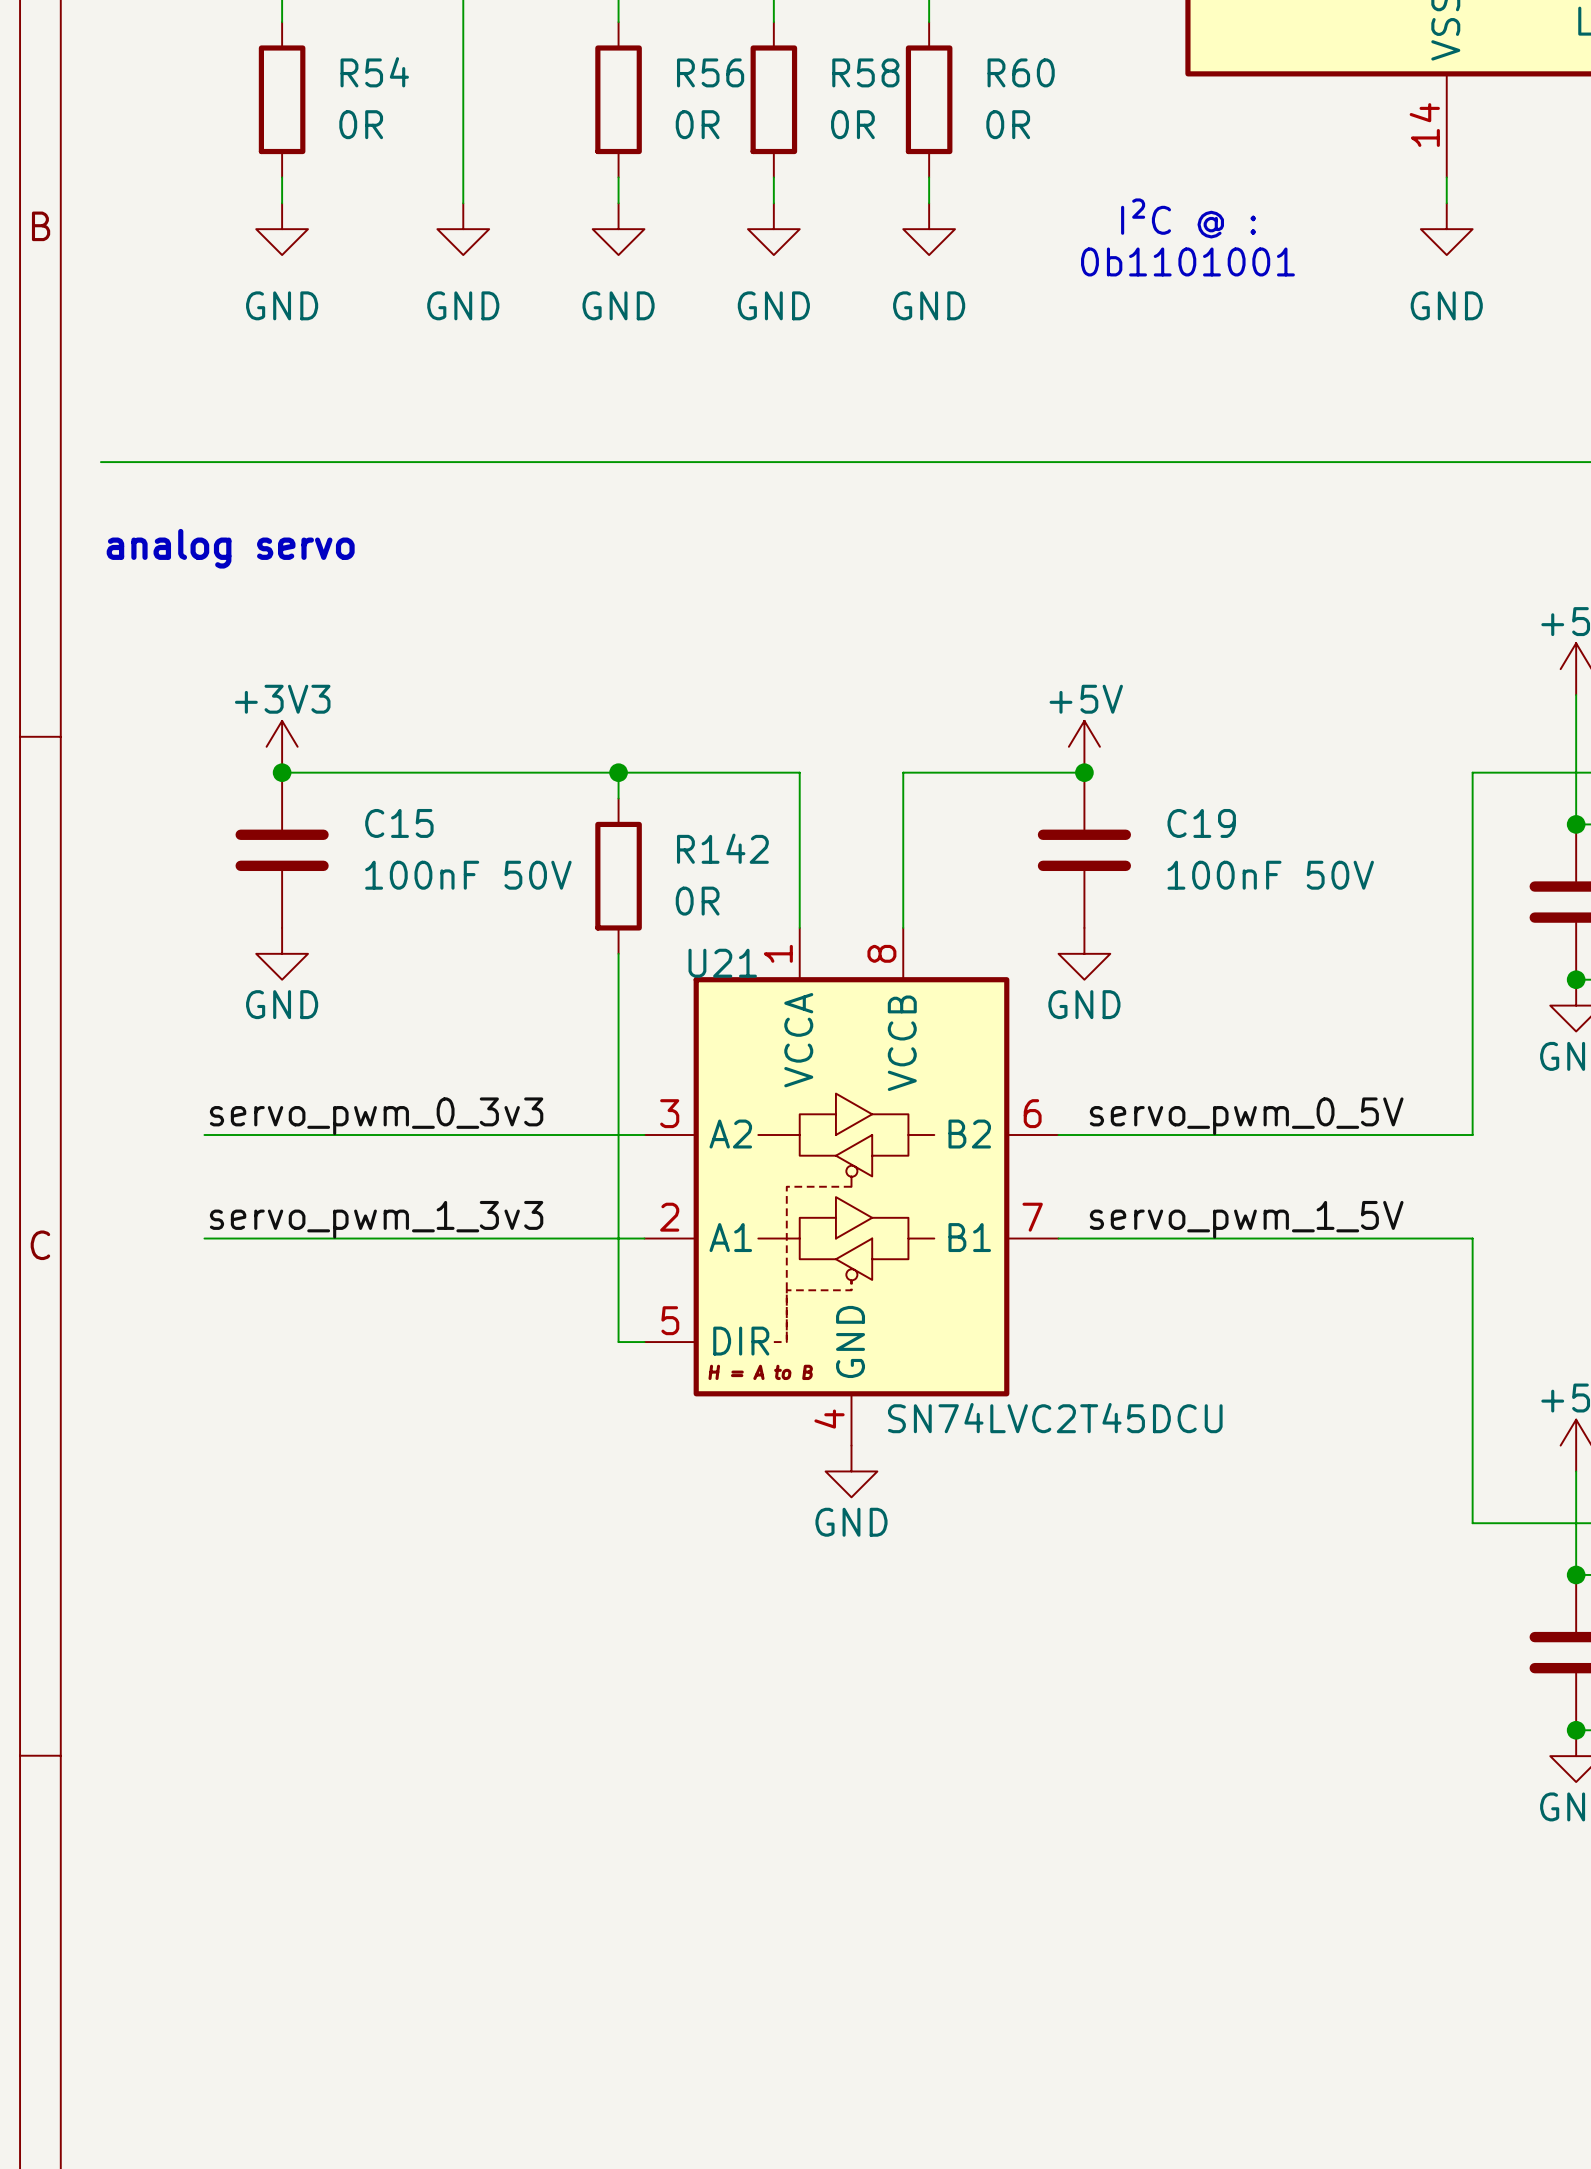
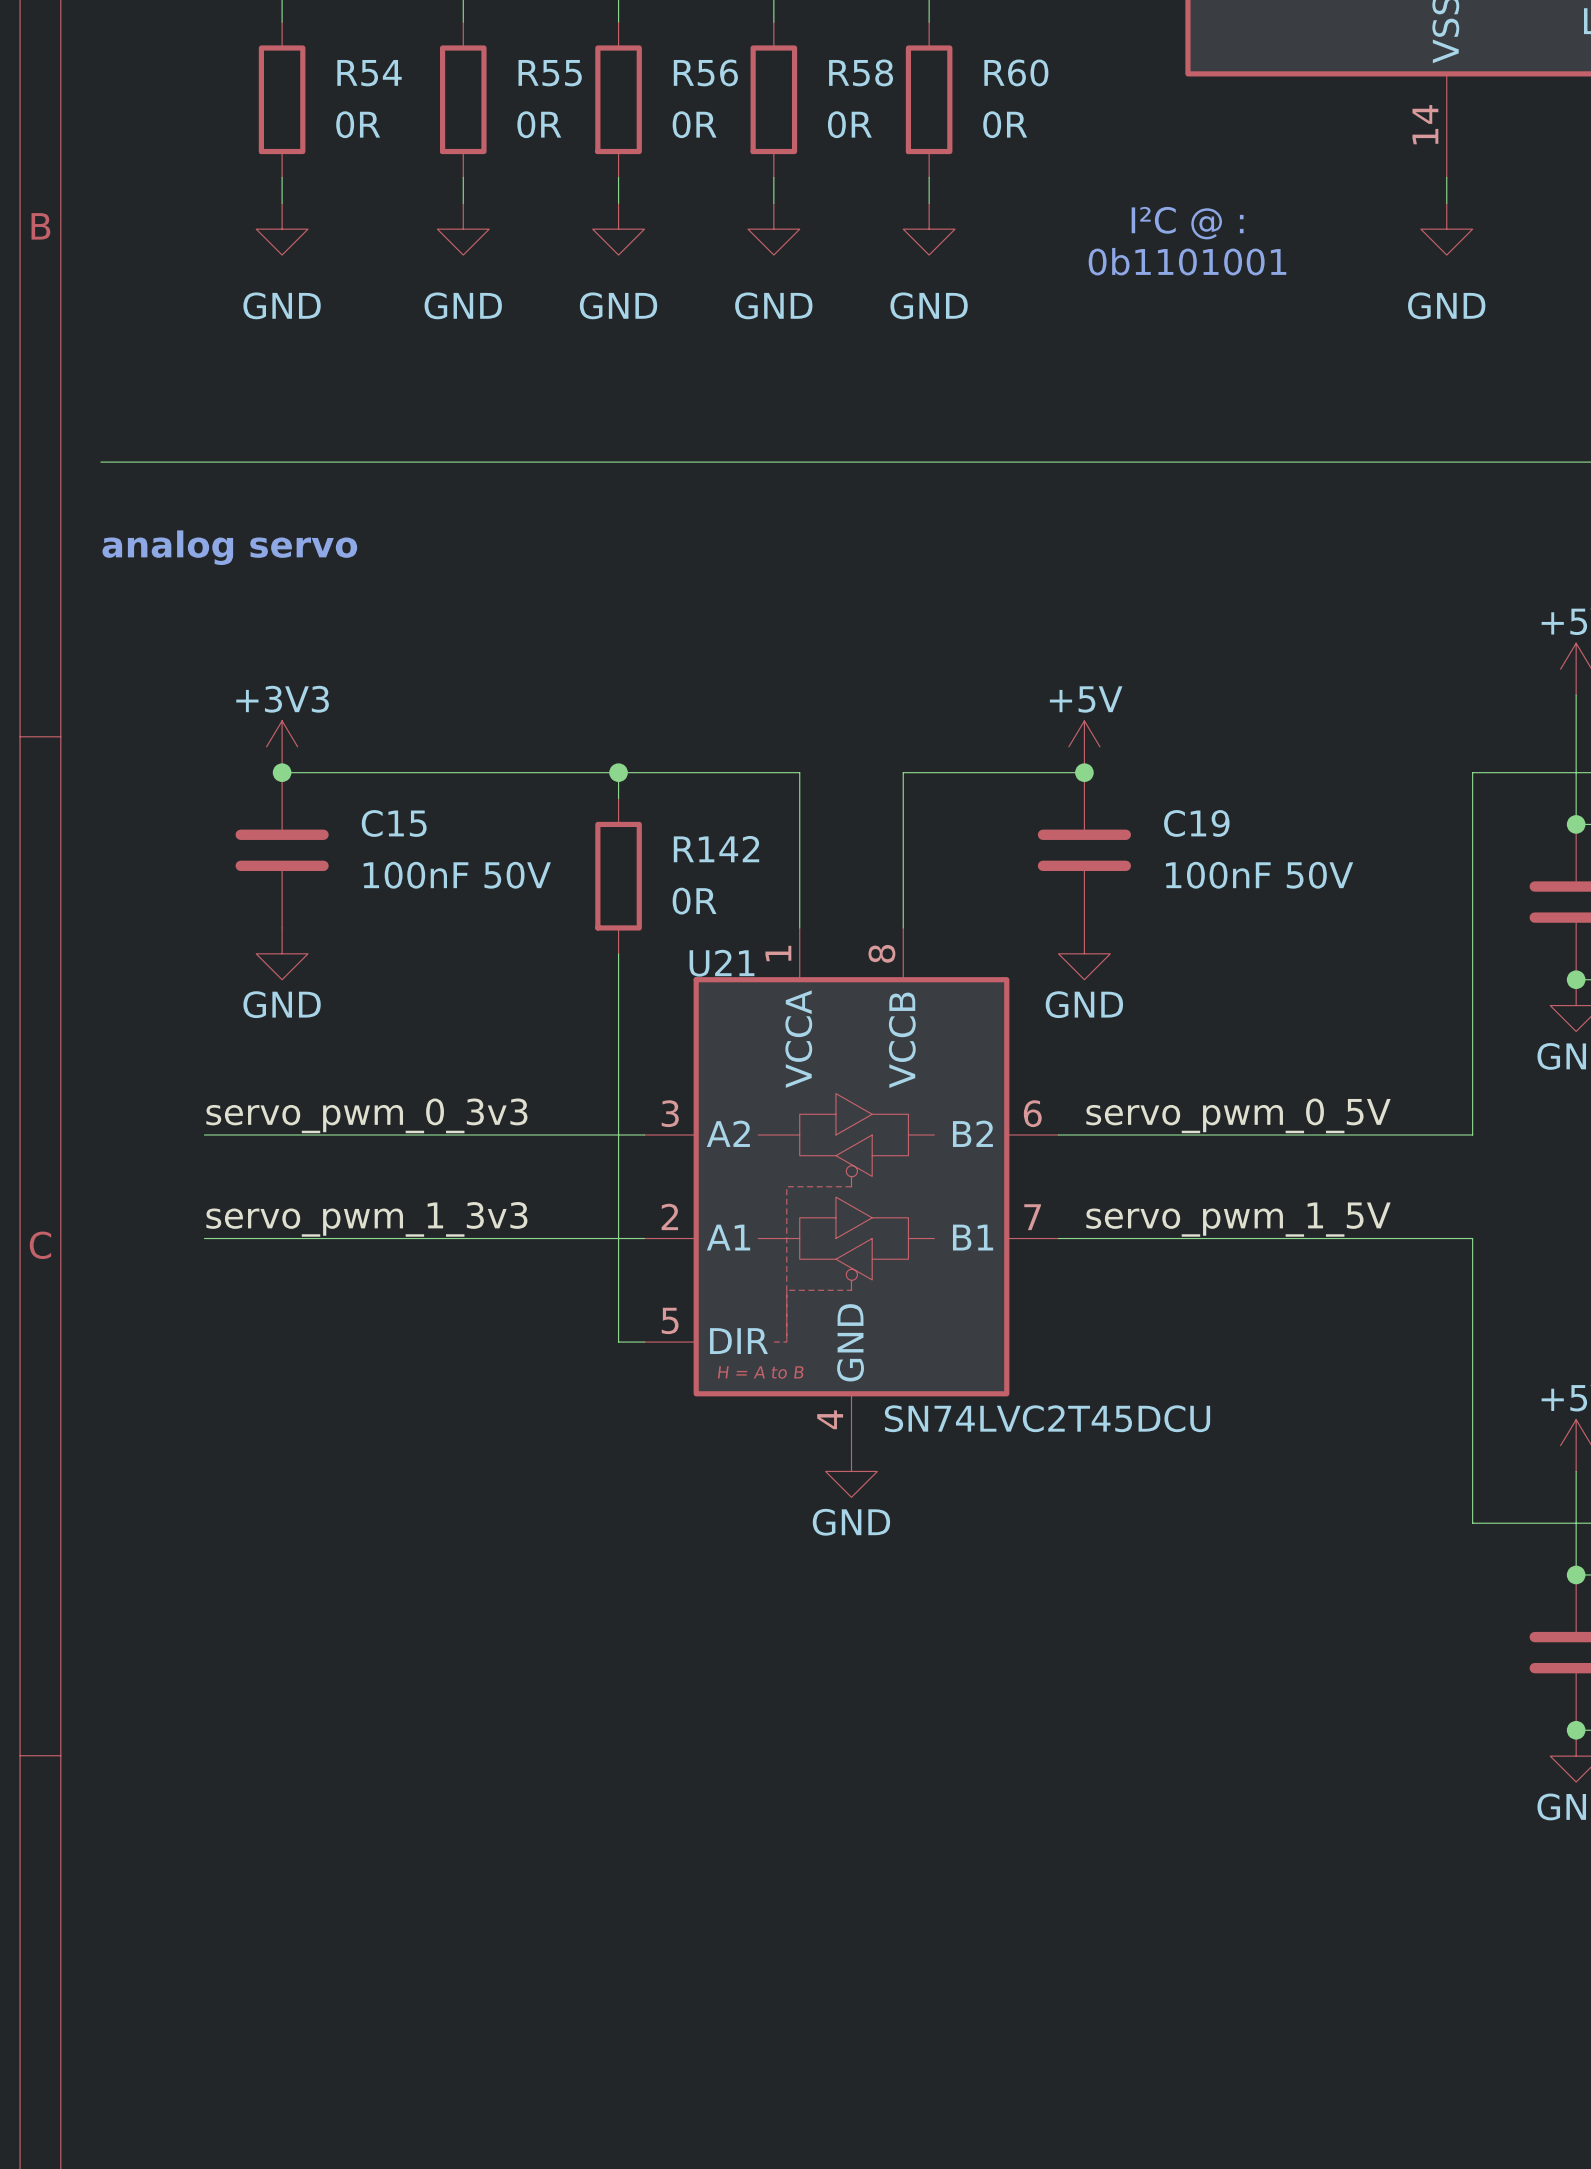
wire: (463, 22) (463, 177) -> none
R55: none -> 0R (463, 99)

